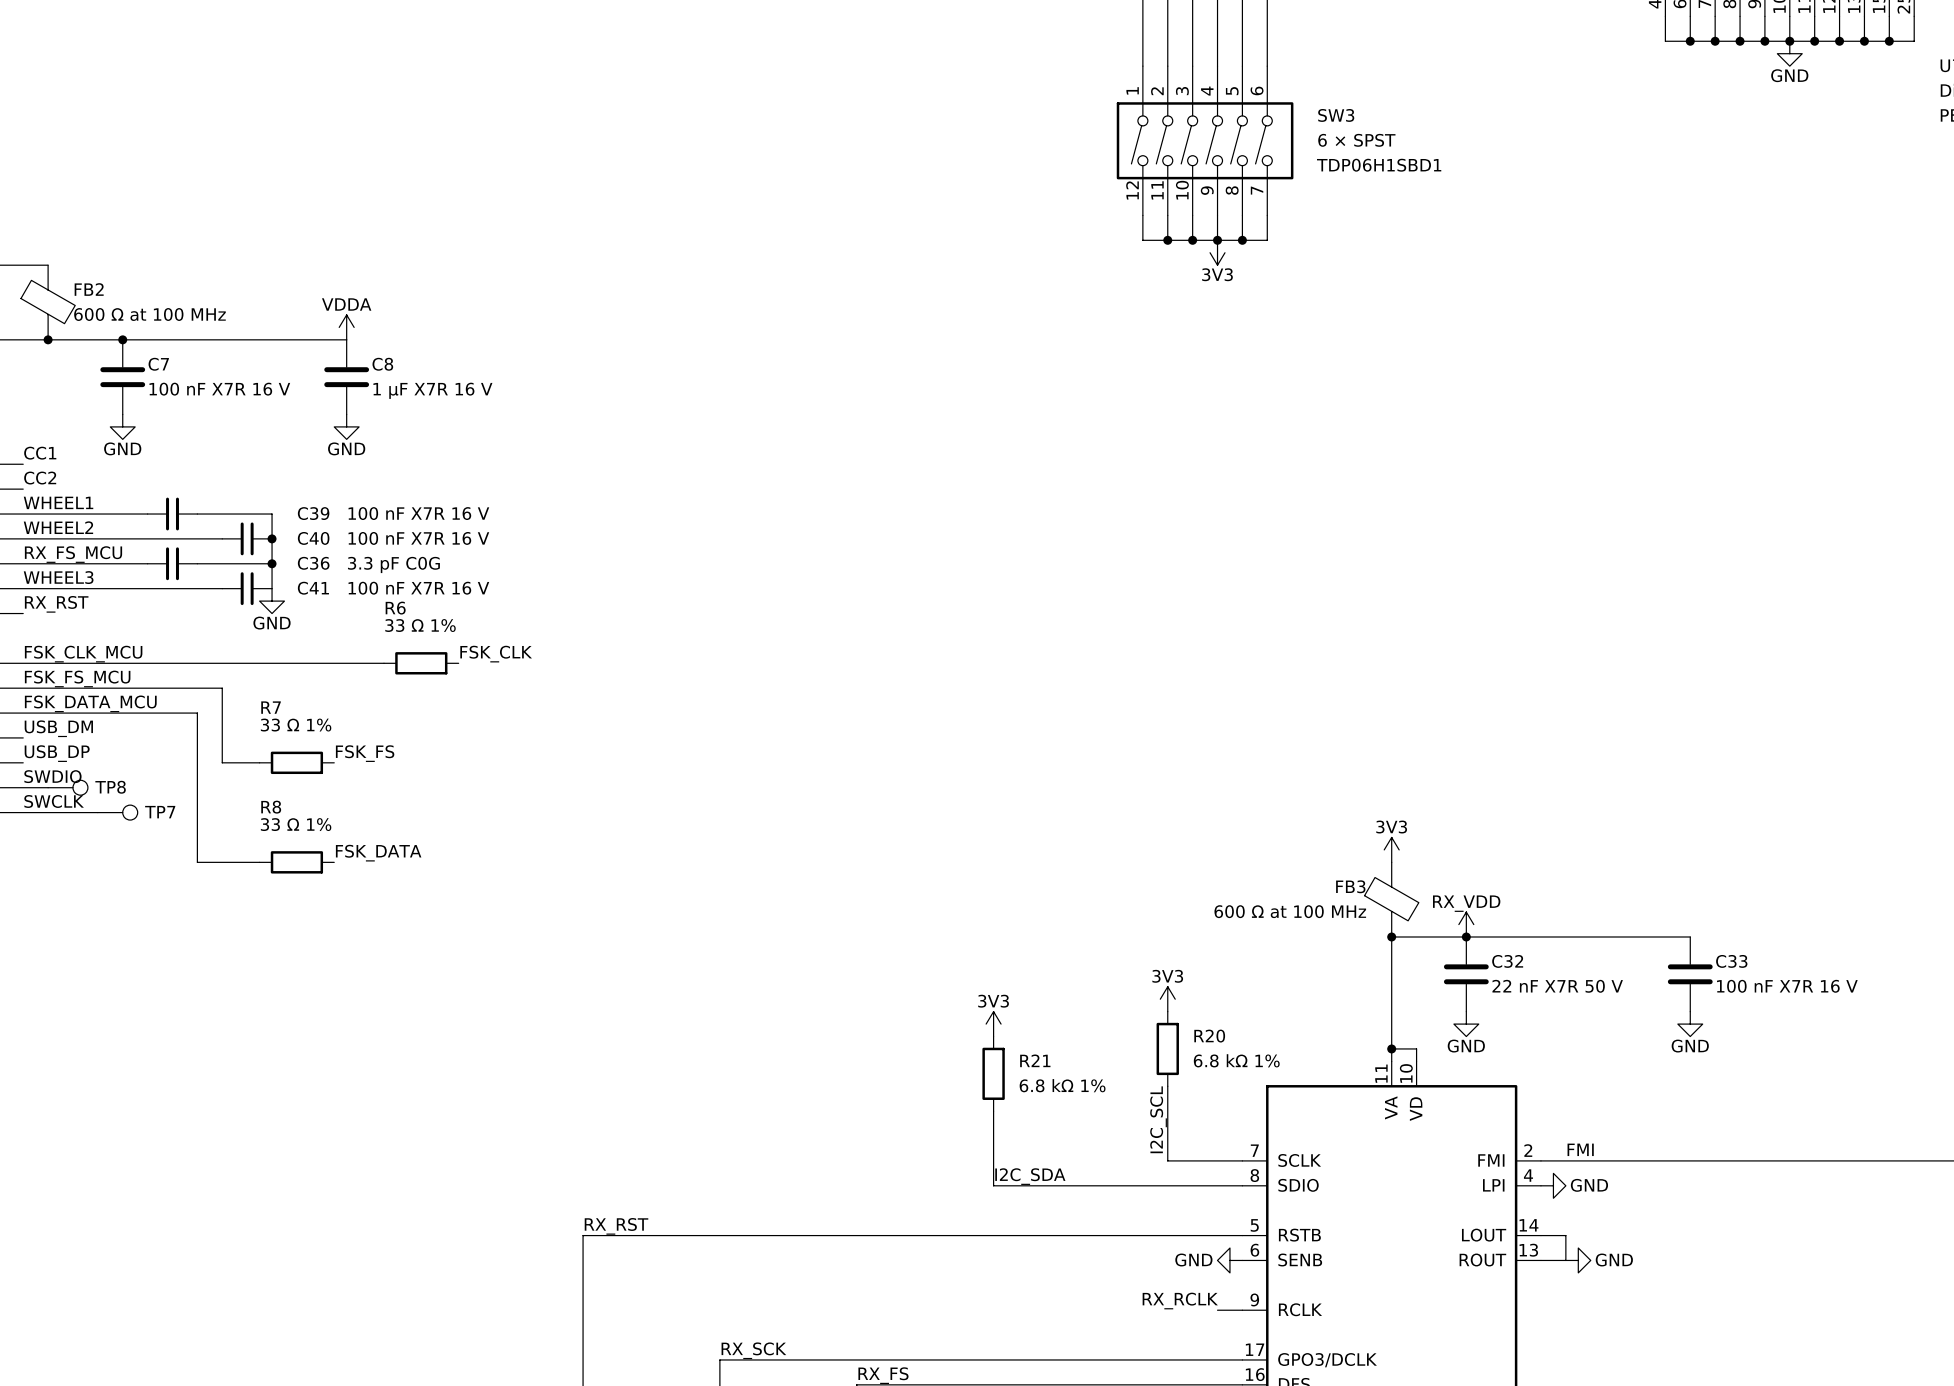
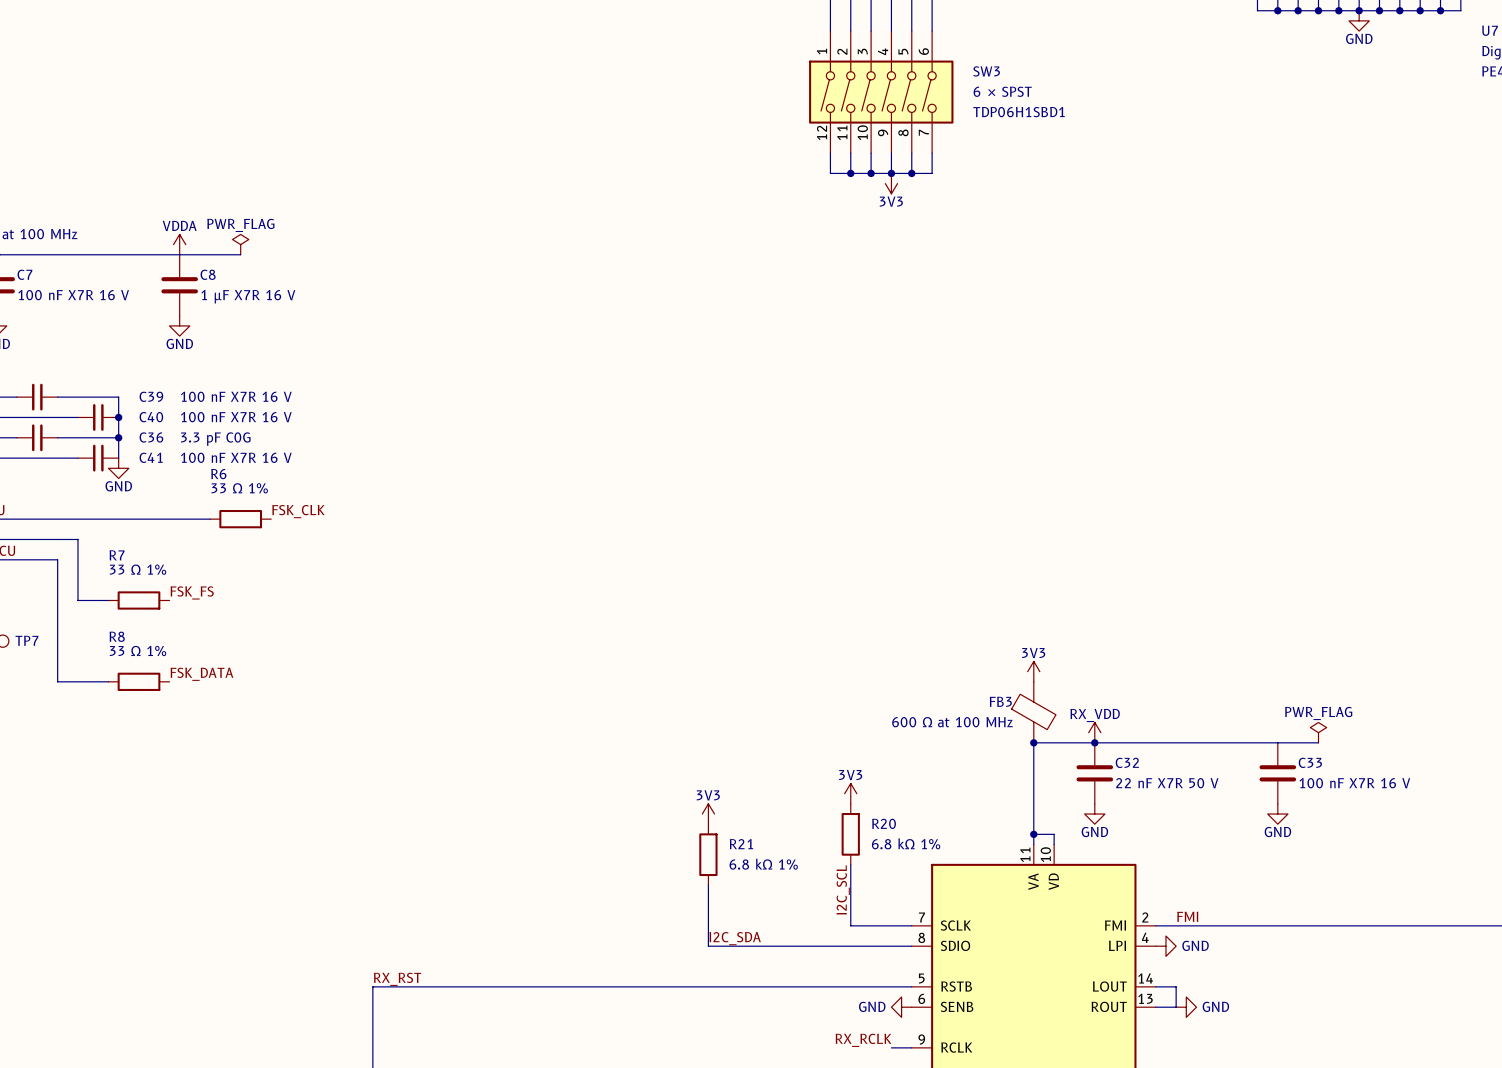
power symbol: none -> PWR_FLAG (240, 244)
wire: none -> (179, 254) (240, 254)
power symbol: none -> PWR_FLAG (1318, 732)
wire: none -> (1277, 742) (1318, 742)

